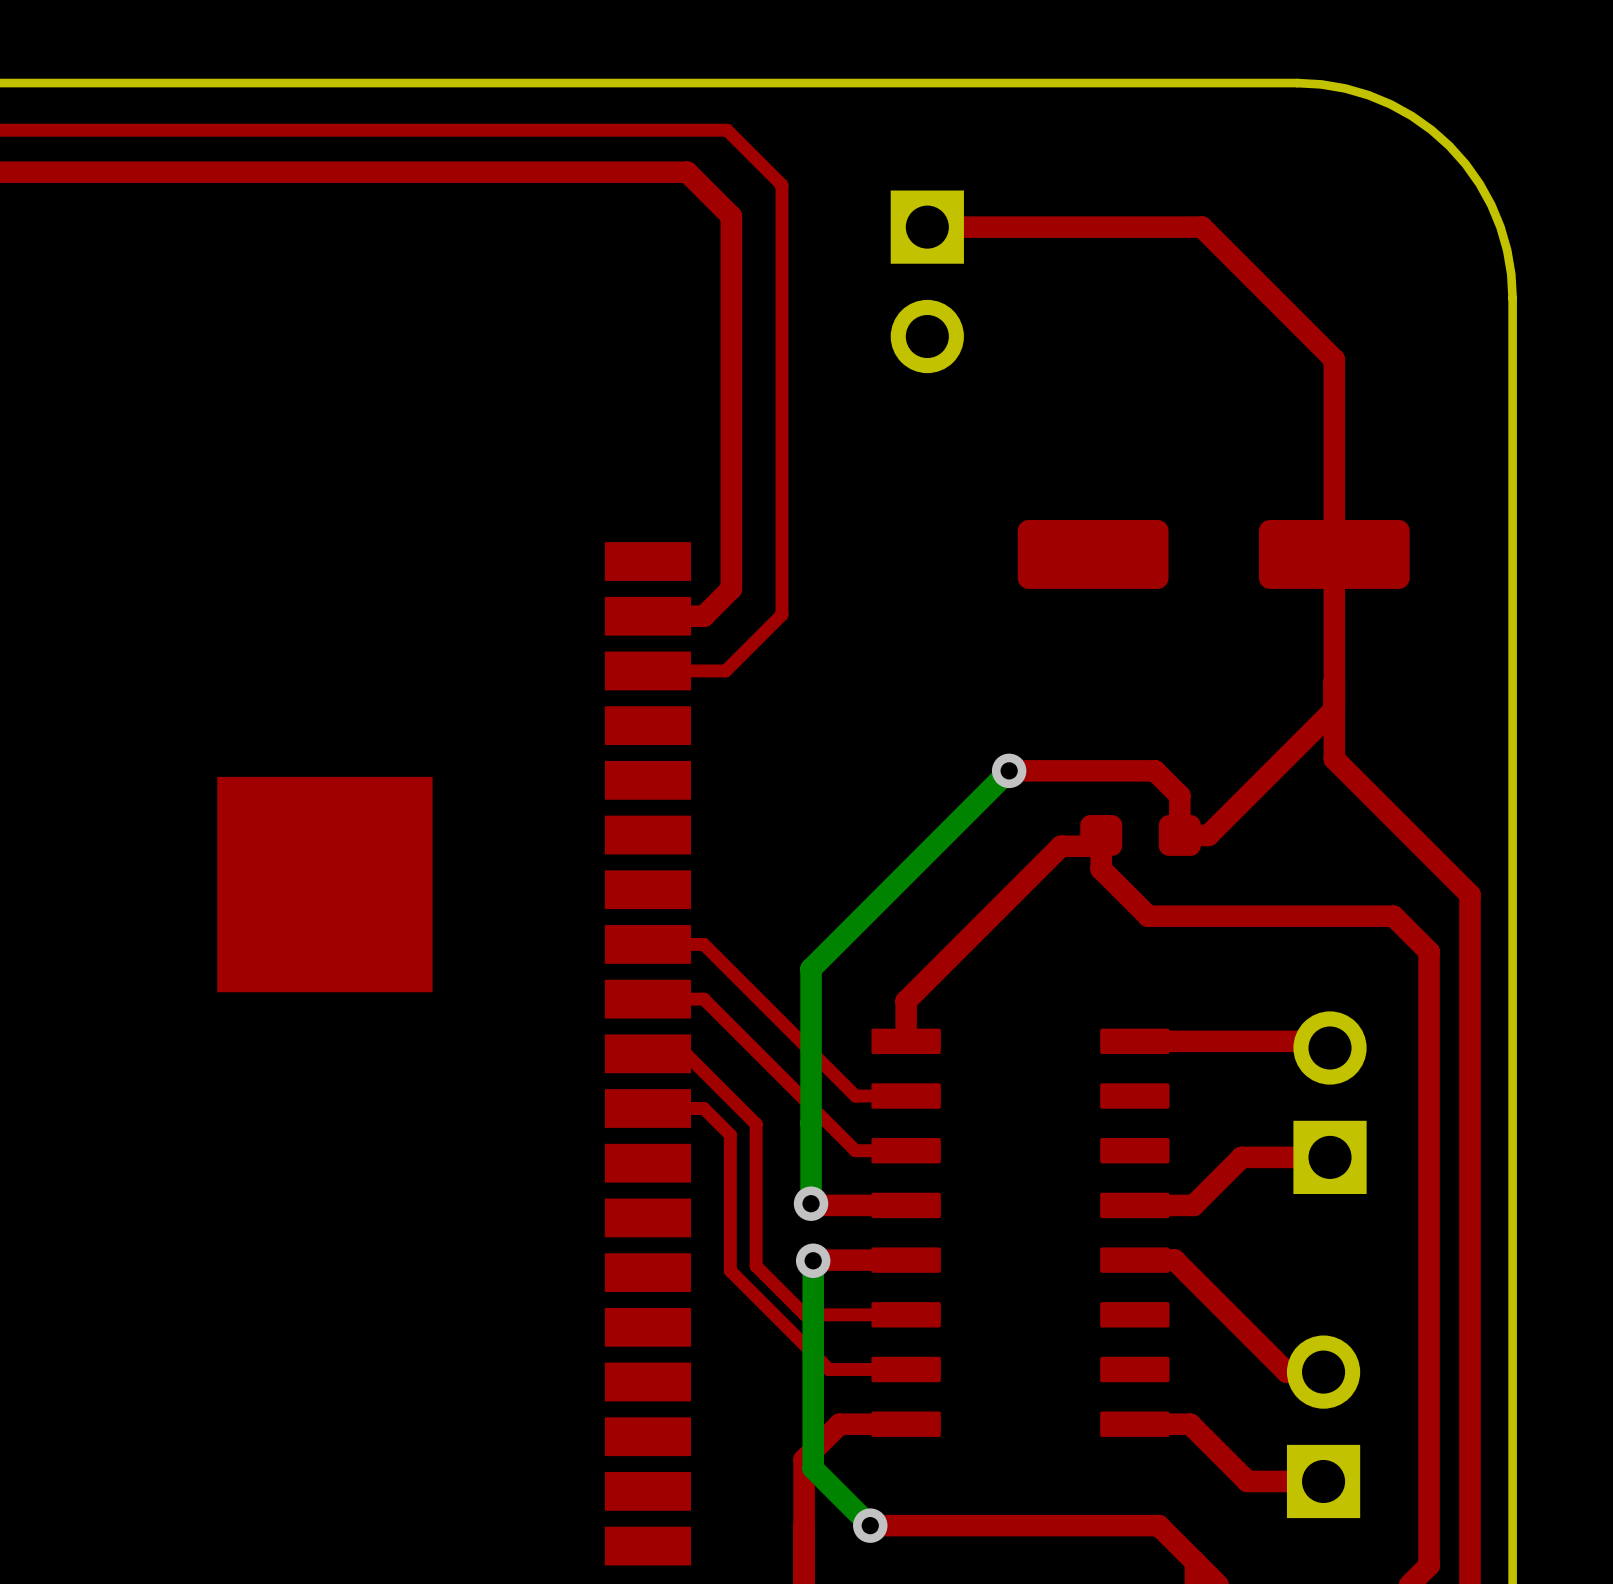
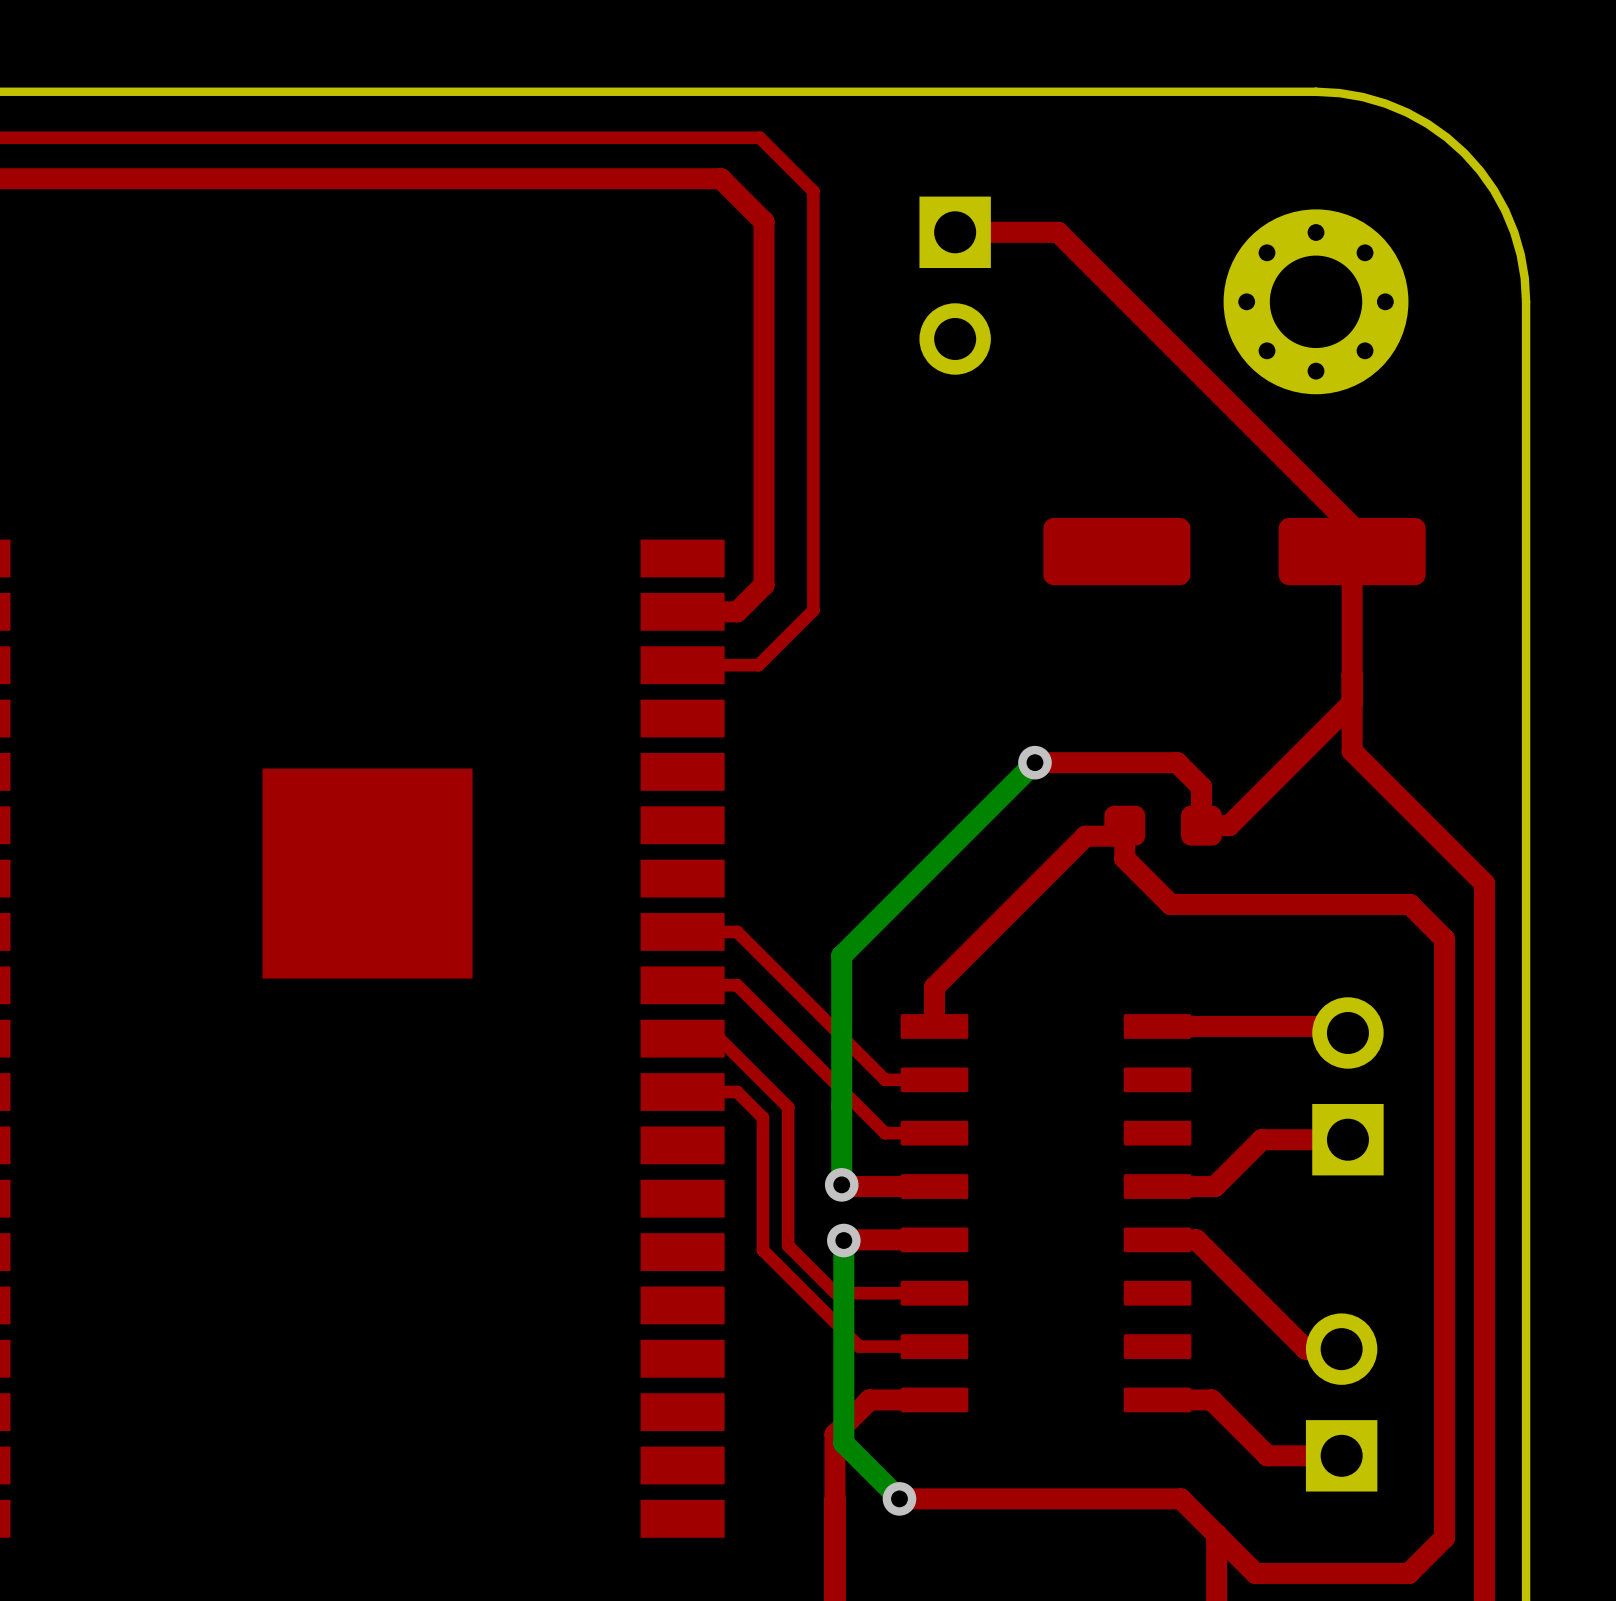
top track: (1032, 227) (1201, 227) (1334, 359) (1334, 528) -> (1058, 232) (1352, 526)
part: none -> (1316, 301)

